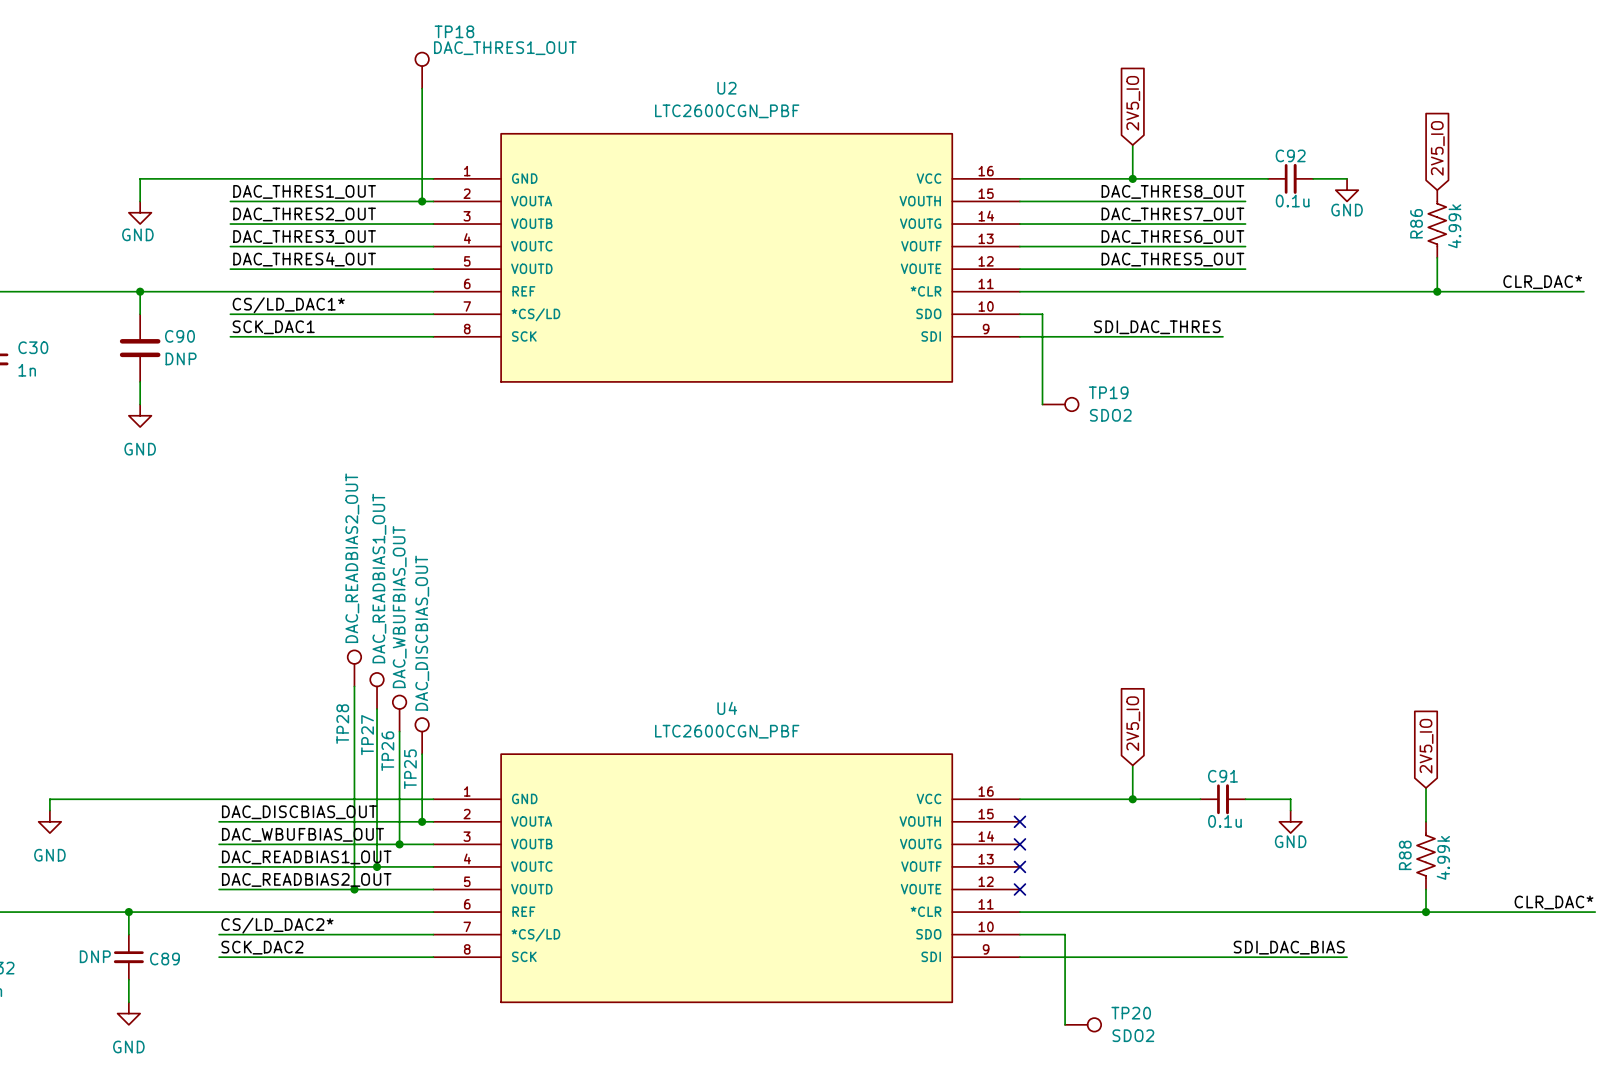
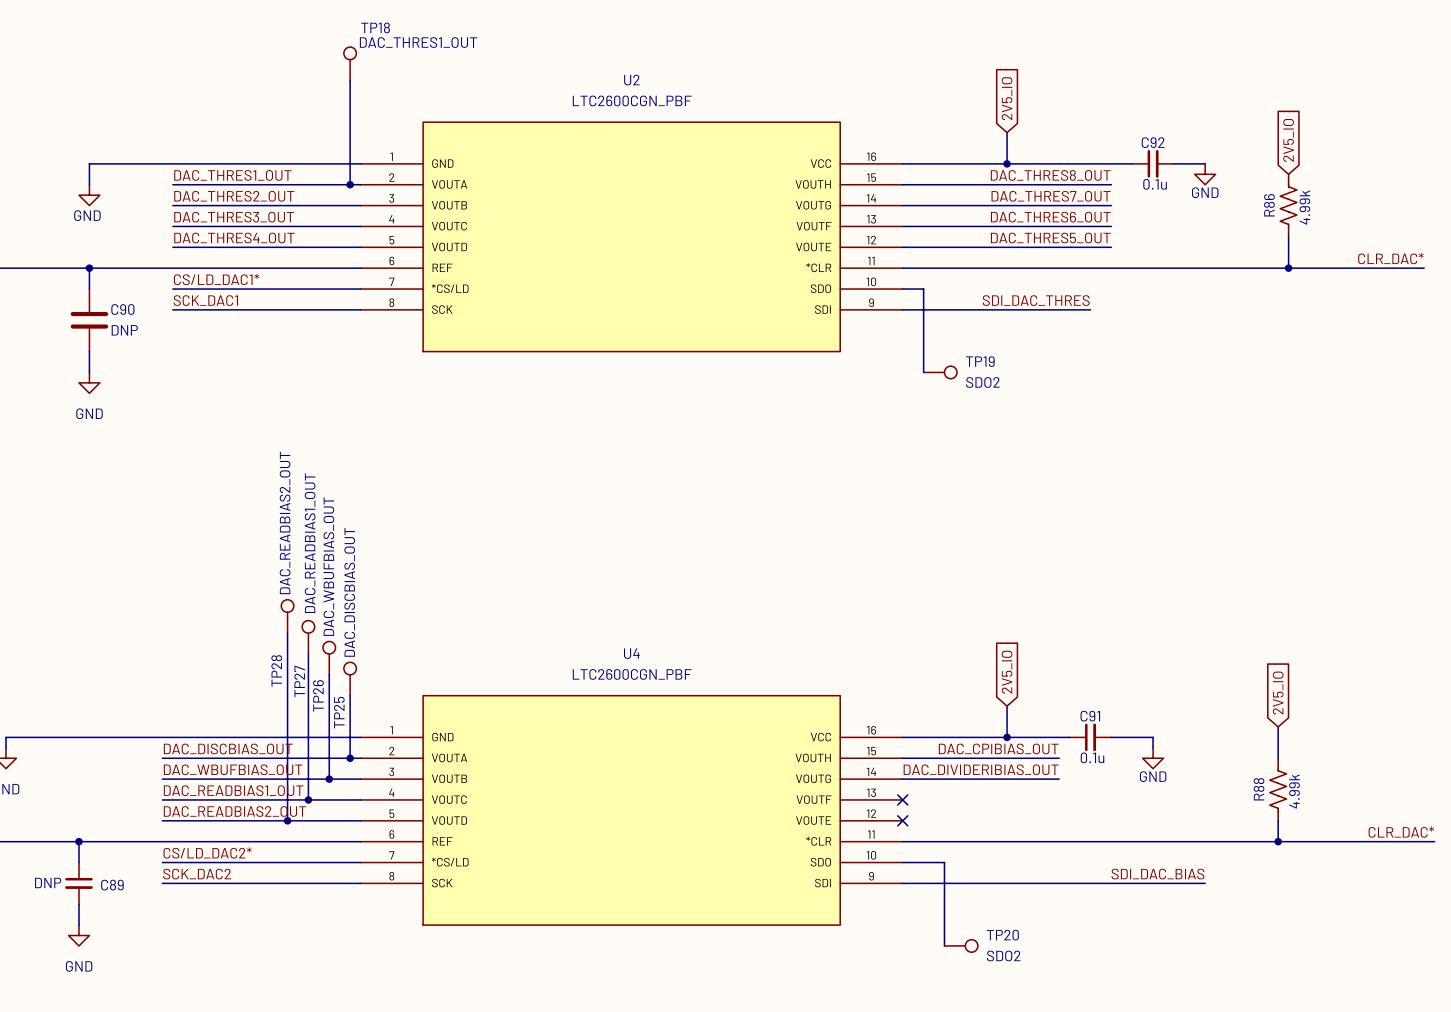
label: none -> DAC_CPIBIAS_OUT (998, 748)
wire: none -> (902, 758) (1059, 758)
no-connect mark: (1019, 821) -> none
label: none -> DAC_DIVIDERIBIAS_OUT (981, 769)
wire: none -> (902, 779) (1059, 779)
no-connect mark: (1019, 844) -> none

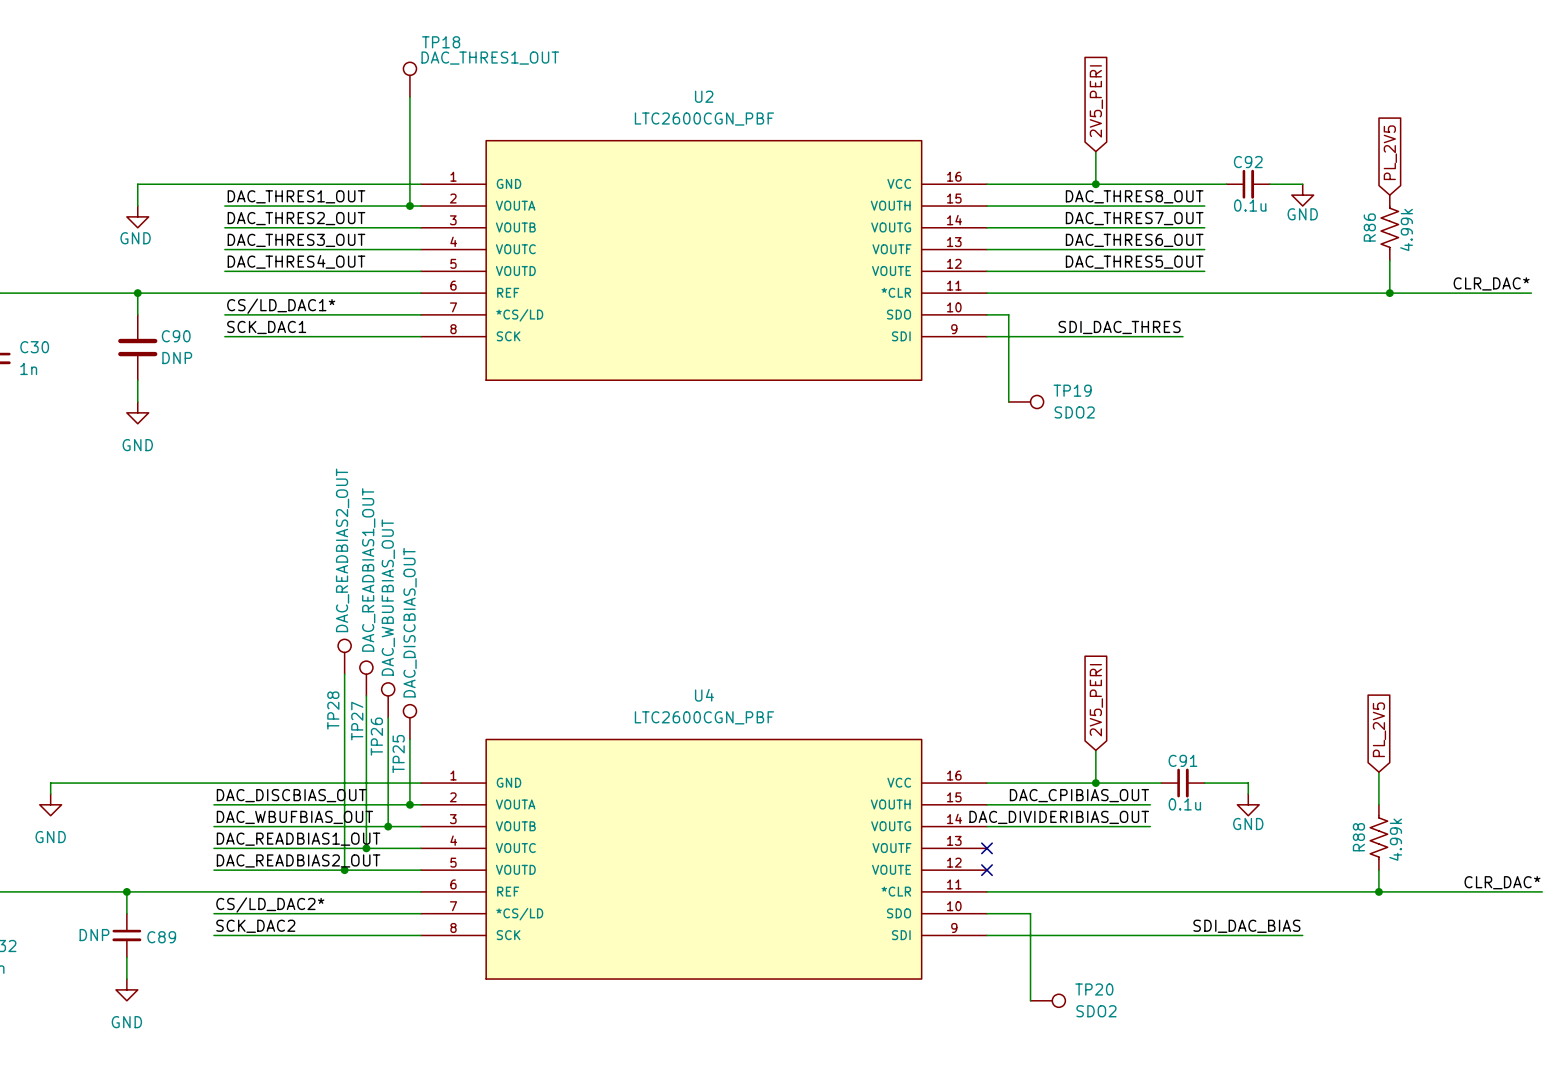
global label: 2V5_IO (1007, 98) -> 2V5_PERI (1096, 101)
global label: 2V5_IO (1288, 140) -> PL_2V5 (1390, 152)
global label: 2V5_IO (1007, 672) -> 2V5_PERI (1096, 700)
global label: 2V5_IO (1278, 692) -> PL_2V5 (1379, 729)

